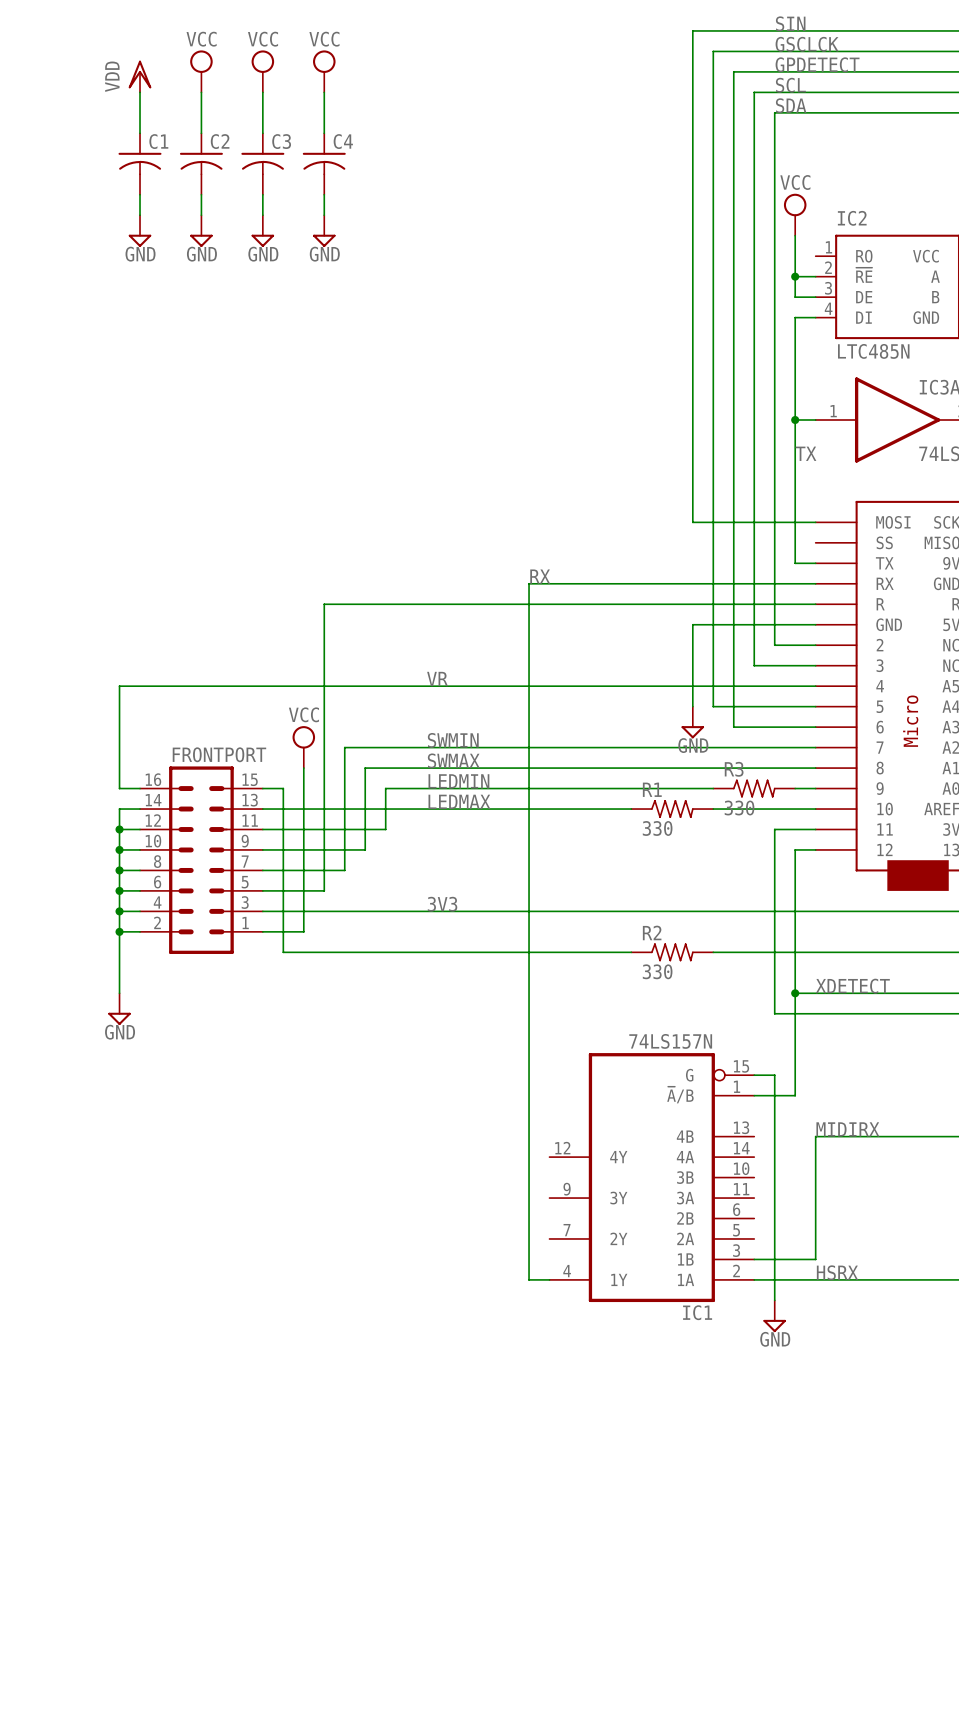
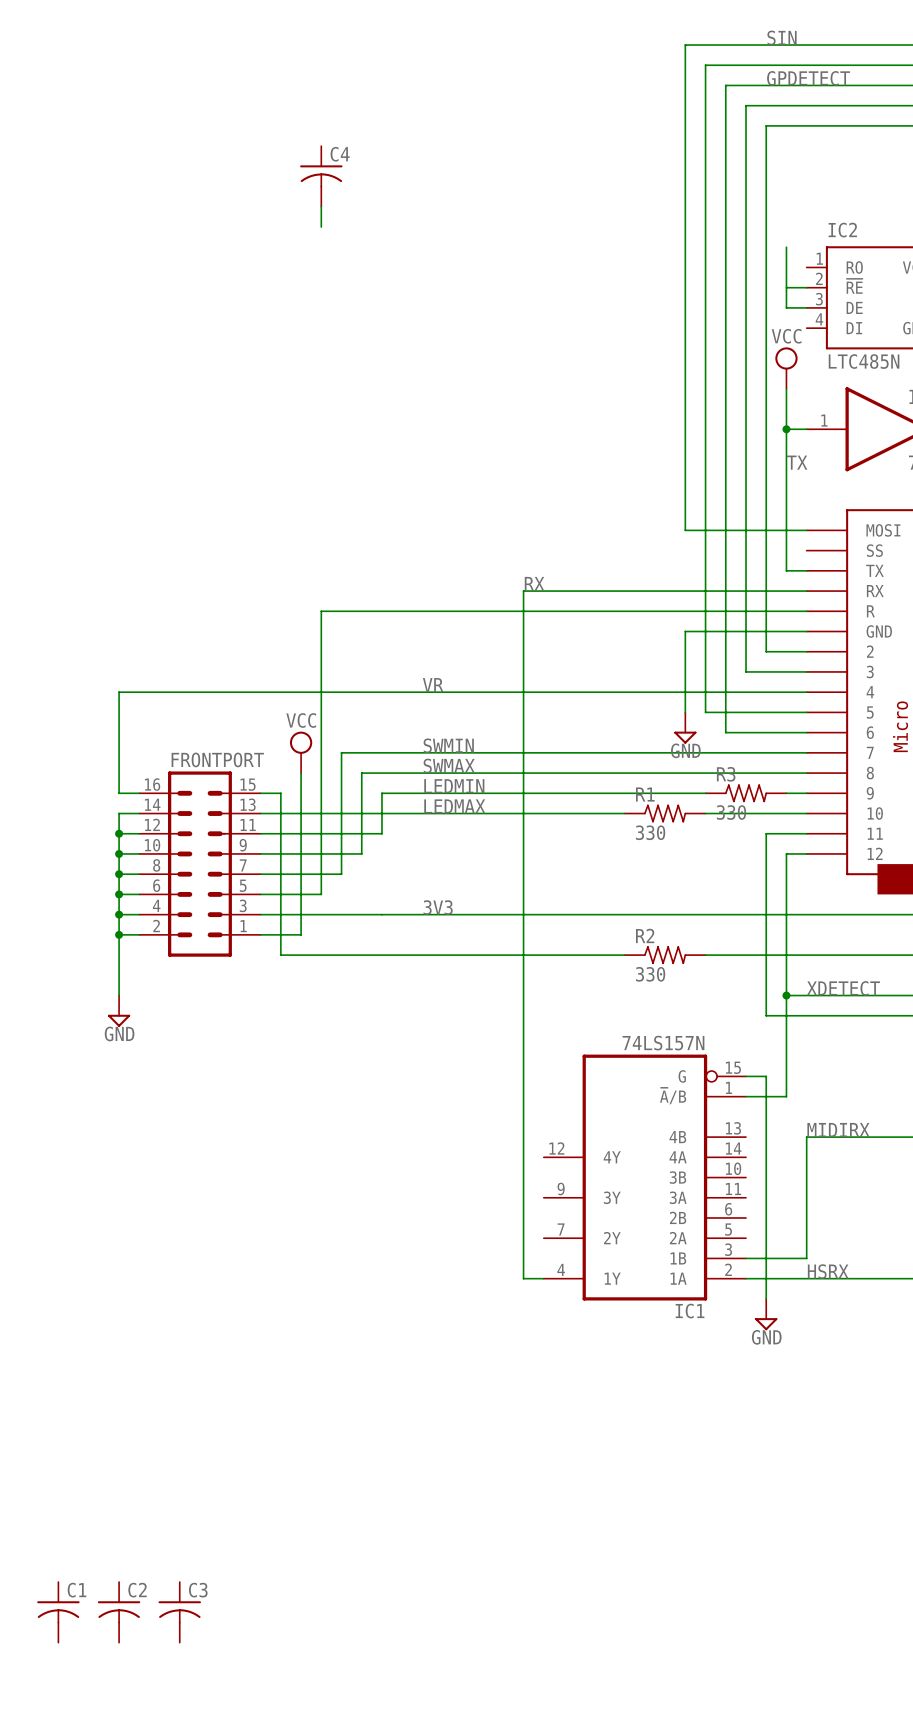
label: GSCLCK (807, 44) -> none
power symbol: VCC (201, 71) -> none
power symbol: VCC (262, 71) -> none
power symbol: VCC (324, 71) -> none
power symbol: VDD (140, 76) -> none
label: SCL (790, 85) -> none
wire: (140, 92) (140, 133) -> none
wire: (201, 92) (201, 133) -> none
wire: (262, 92) (262, 133) -> none
wire: (324, 92) (324, 133) -> none
label: SDA (791, 105) -> none
C1 position: (140, 164) -> (58, 1612)
C2 position: (201, 164) -> (119, 1612)
C3 position: (262, 164) -> (179, 1612)
wire: (140, 194) (140, 215) -> none
wire: (201, 194) (201, 215) -> none
wire: (262, 194) (262, 215) -> none
power symbol: VCC (795, 214) -> none
power symbol: GND (140, 231) -> none
power symbol: GND (201, 231) -> none
power symbol: GND (262, 231) -> none
power symbol: GND (324, 231) -> none
junction: (795, 276) -> none
wire: (815, 317) (795, 317) (795, 379) -> none
power symbol: none -> VCC (786, 368)

